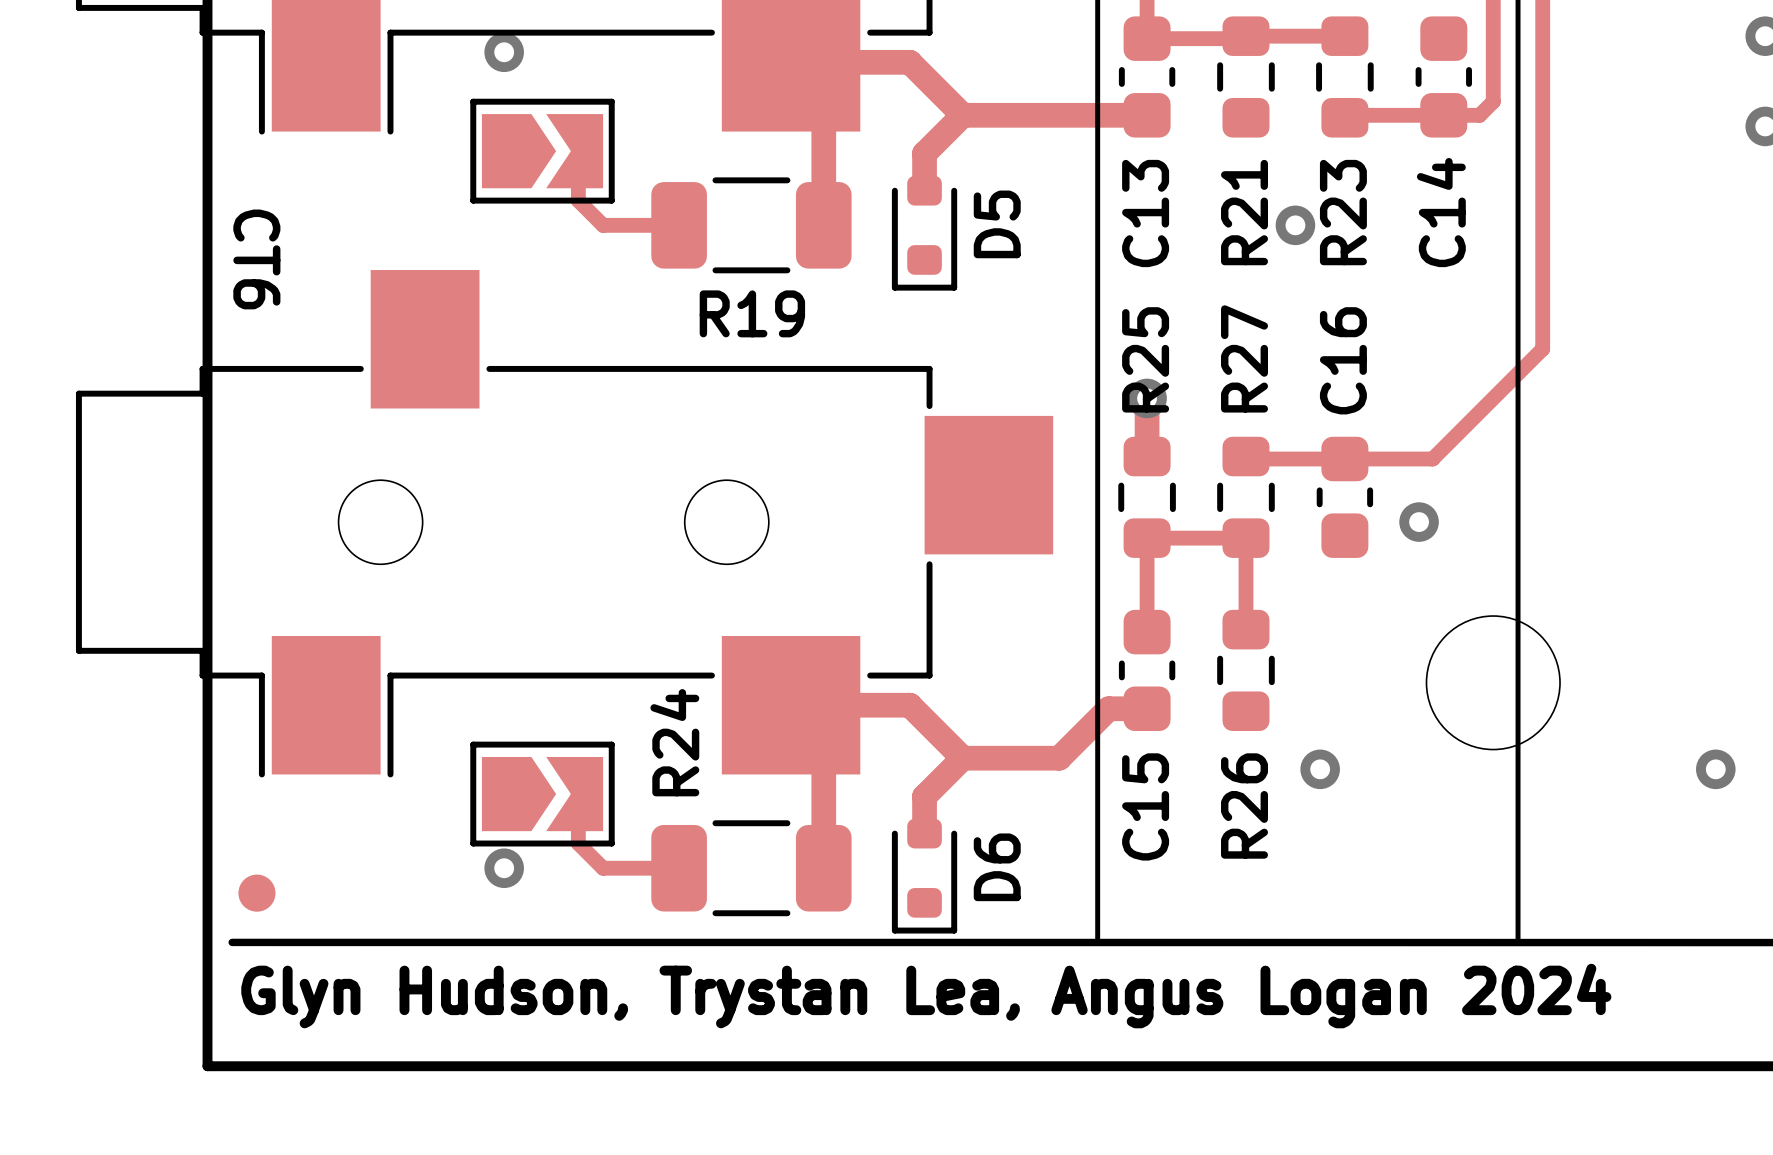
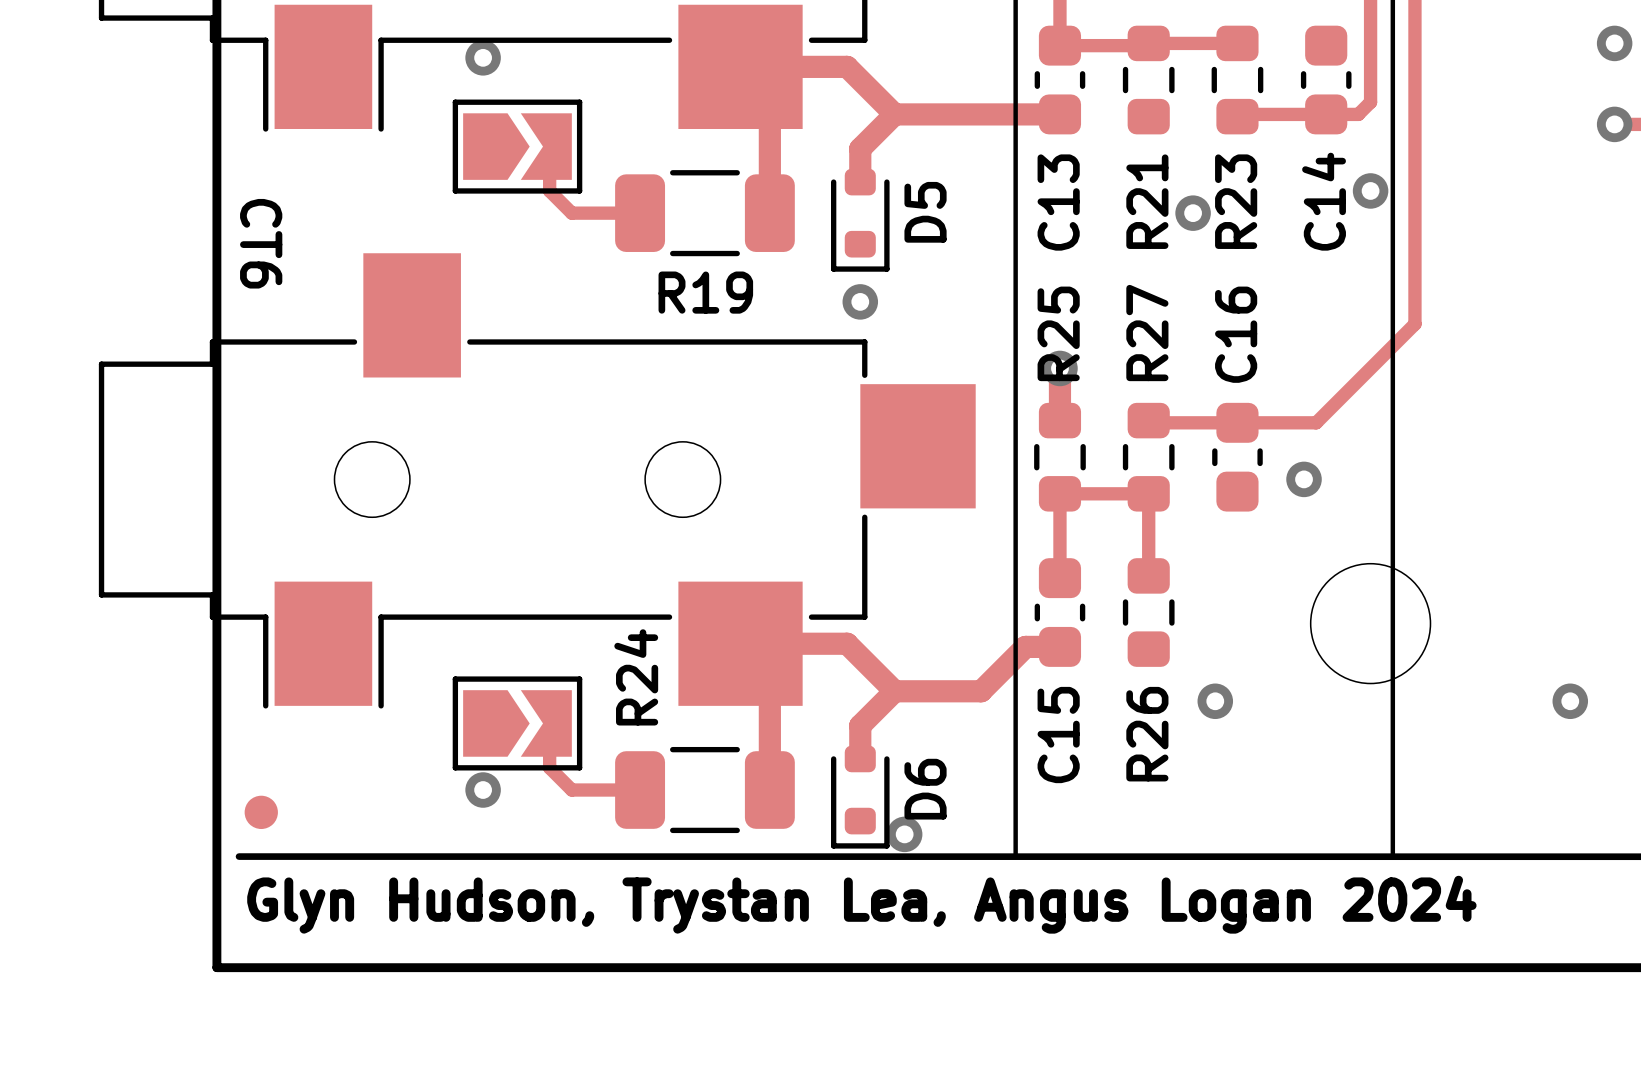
via: none -> (1370, 190)
via: none -> (860, 301)
via: none -> (904, 834)

